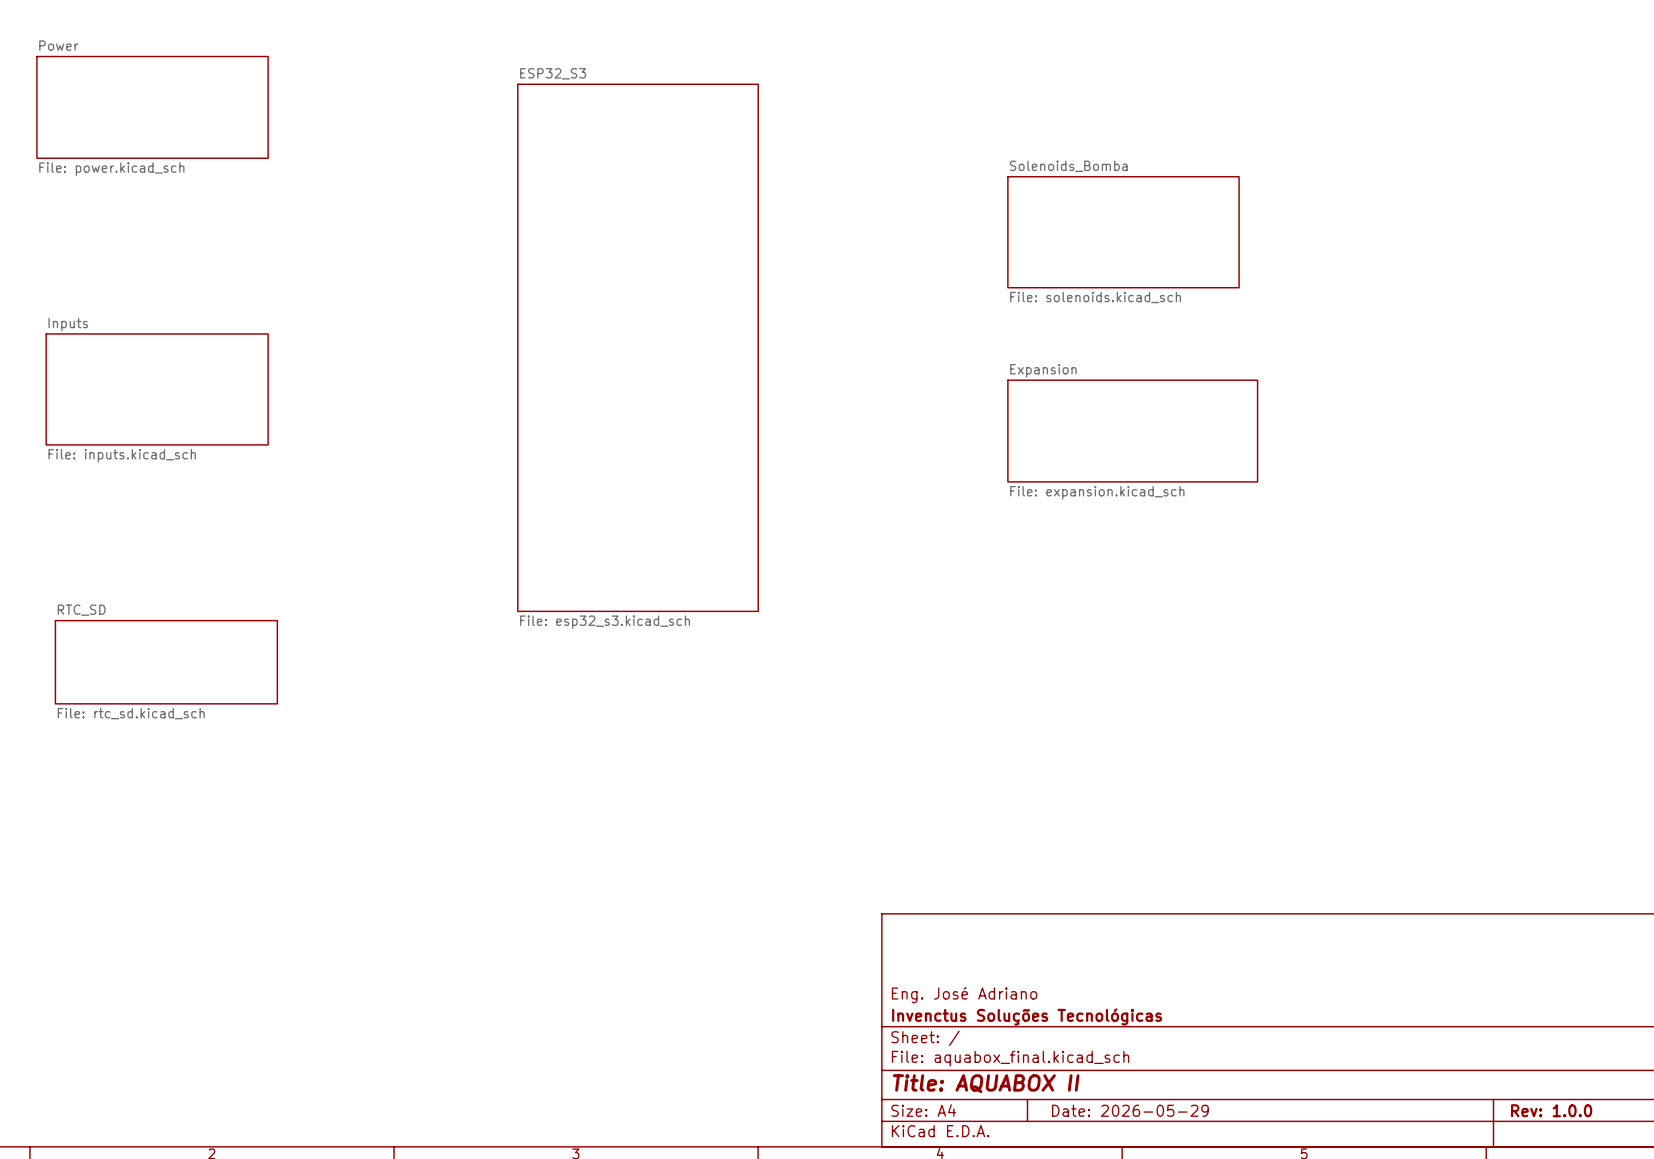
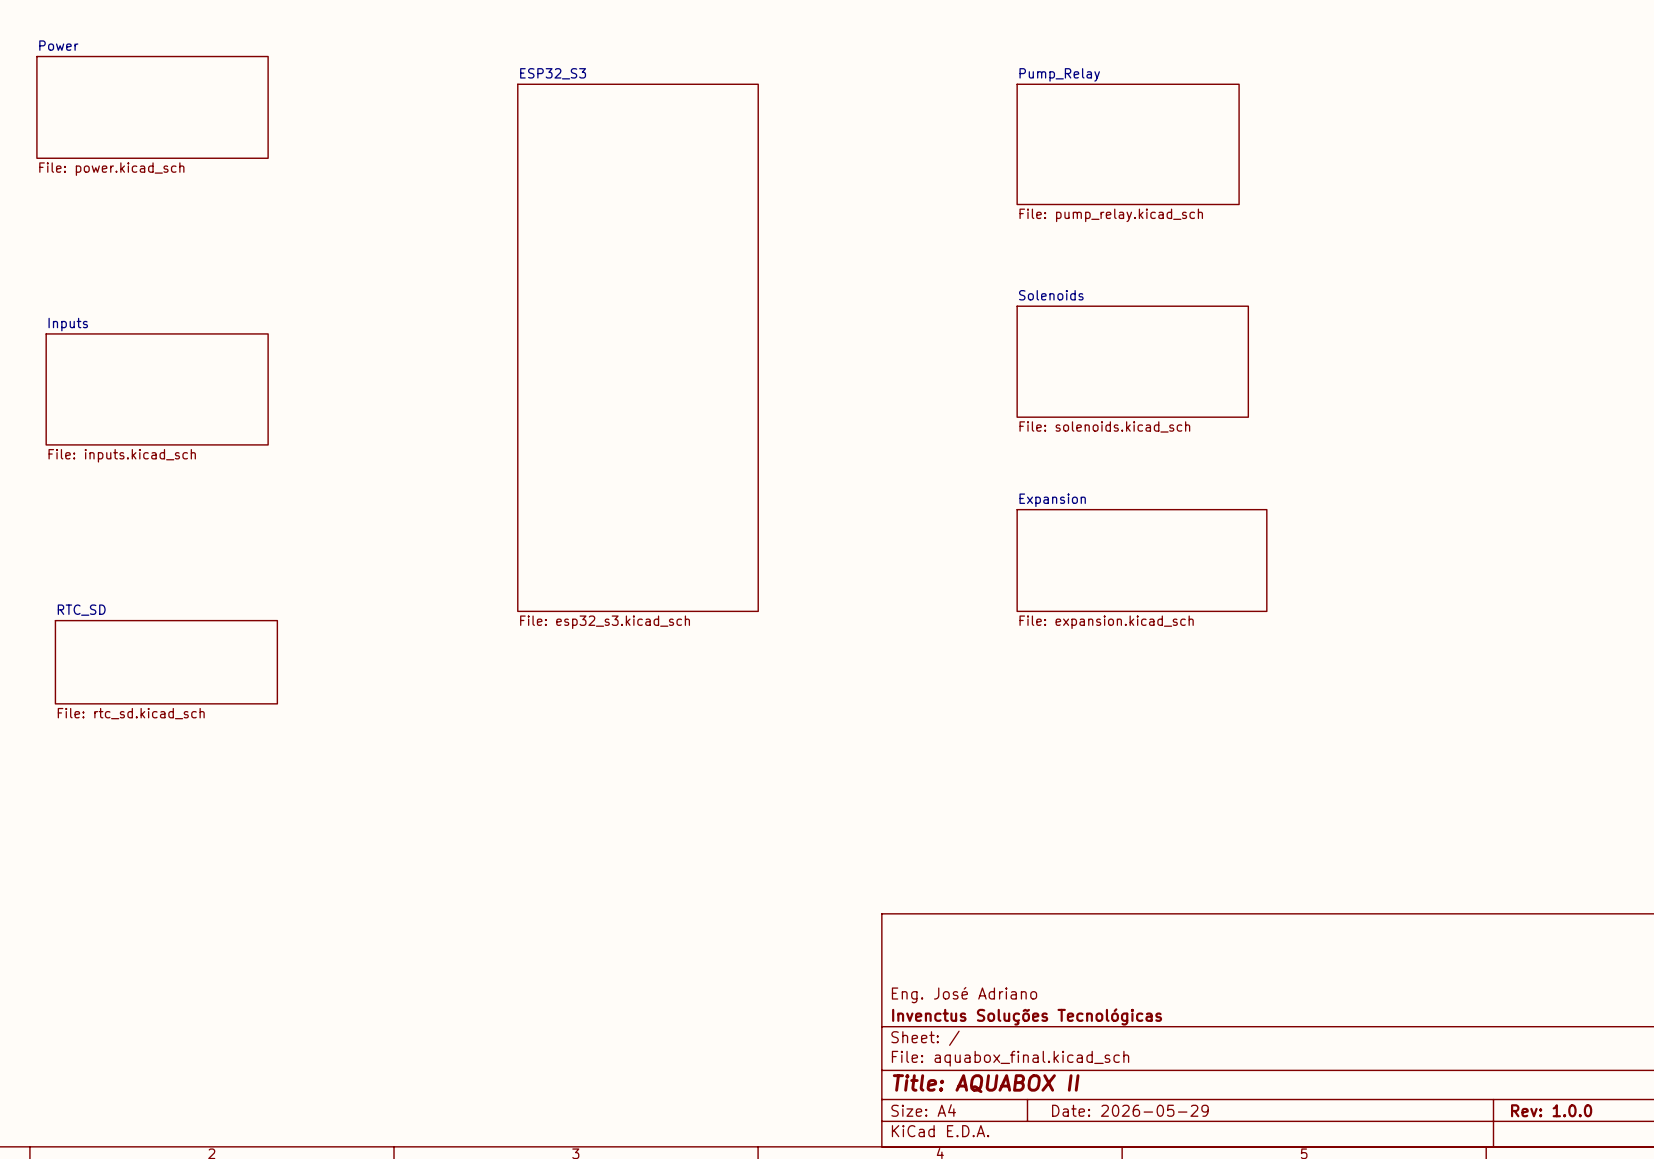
sheet Pump_Relay: none -> File: pump_relay.kicad_sch (1128, 144)
sheet Solenoids_Bomba: File: solenoids.kicad_sch (1123, 232) -> none
sheet Solenoids: none -> File: solenoids.kicad_sch (1132, 361)
sheet Expansion position: (1132, 431) -> (1141, 560)

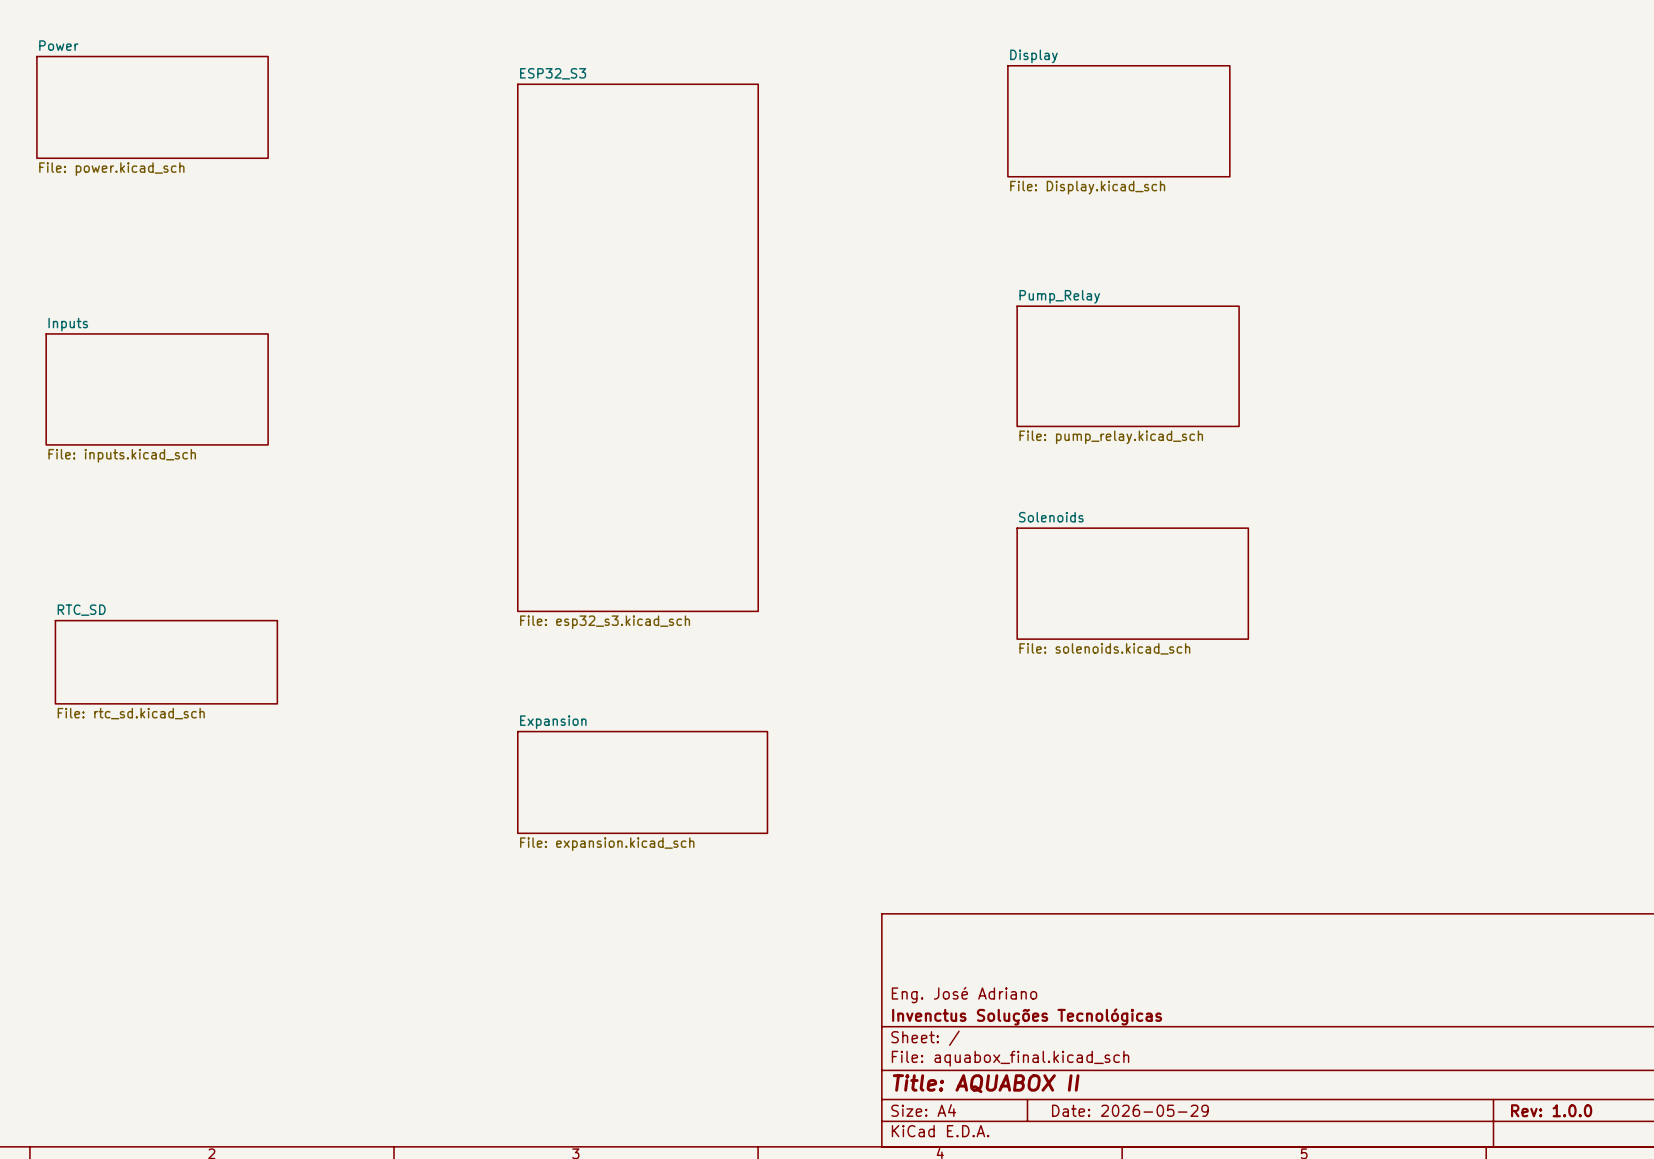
sheet Display: none -> File: Display.kicad_sch (1118, 121)
sheet Pump_Relay: File: pump_relay.kicad_sch (1128, 144) -> none
sheet Solenoids: File: solenoids.kicad_sch (1132, 361) -> none
sheet Pump_Relay: none -> File: pump_relay.kicad_sch (1128, 366)
sheet Expansion: File: expansion.kicad_sch (1141, 560) -> none
sheet Solenoids: none -> File: solenoids.kicad_sch (1132, 583)
sheet Expansion: none -> File: expansion.kicad_sch (642, 782)

